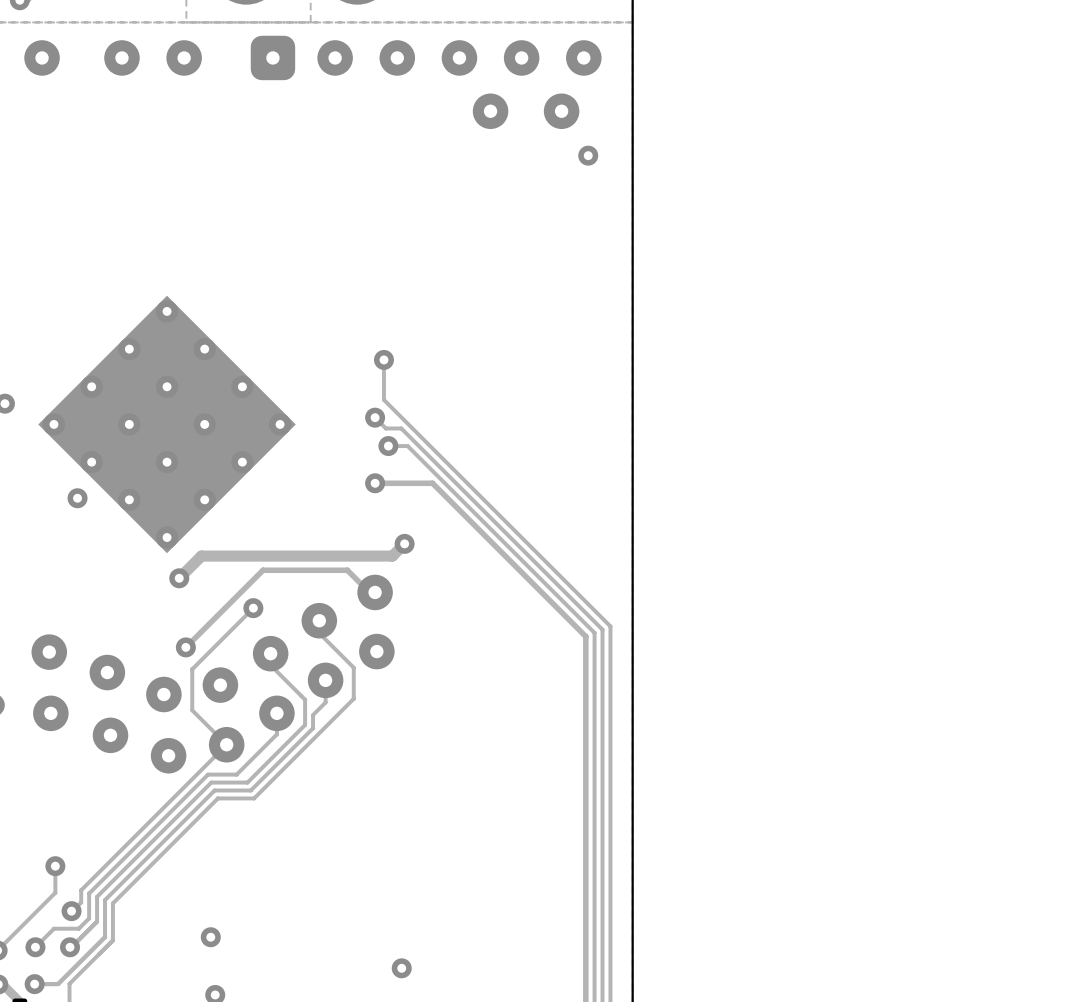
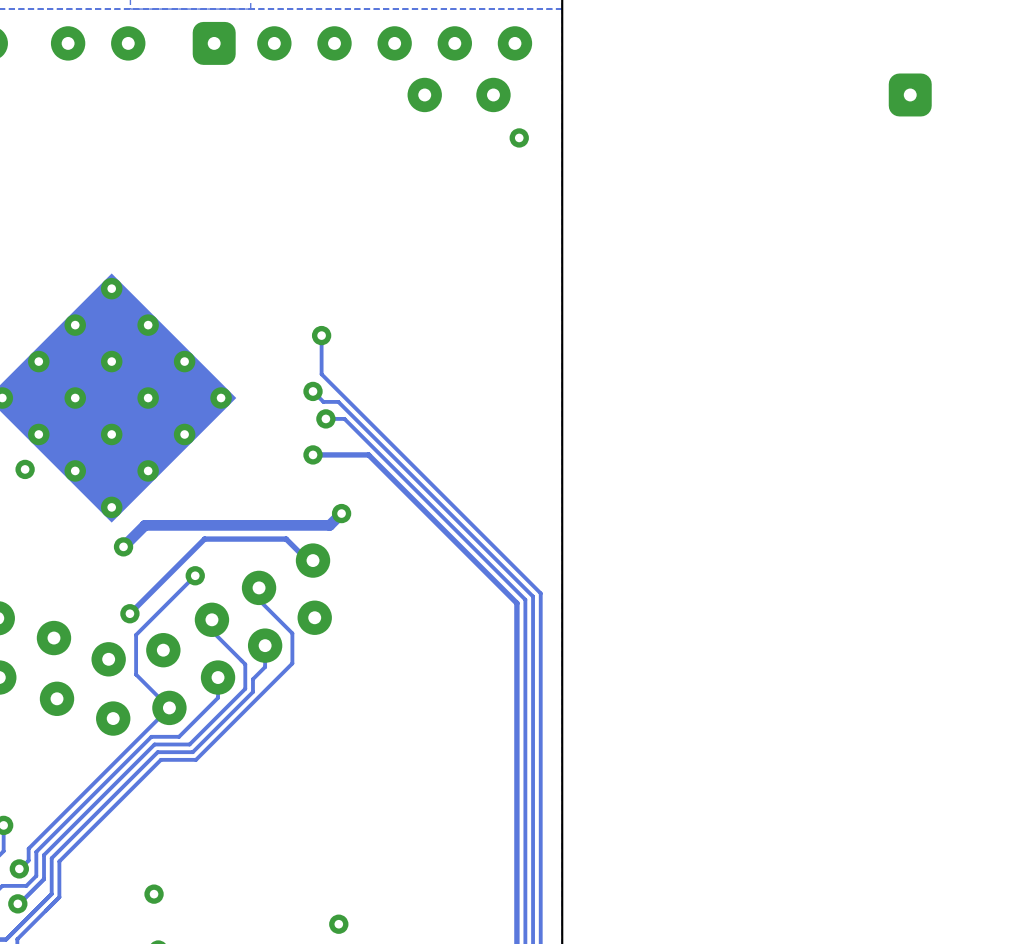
part: none -> (910, 94)

